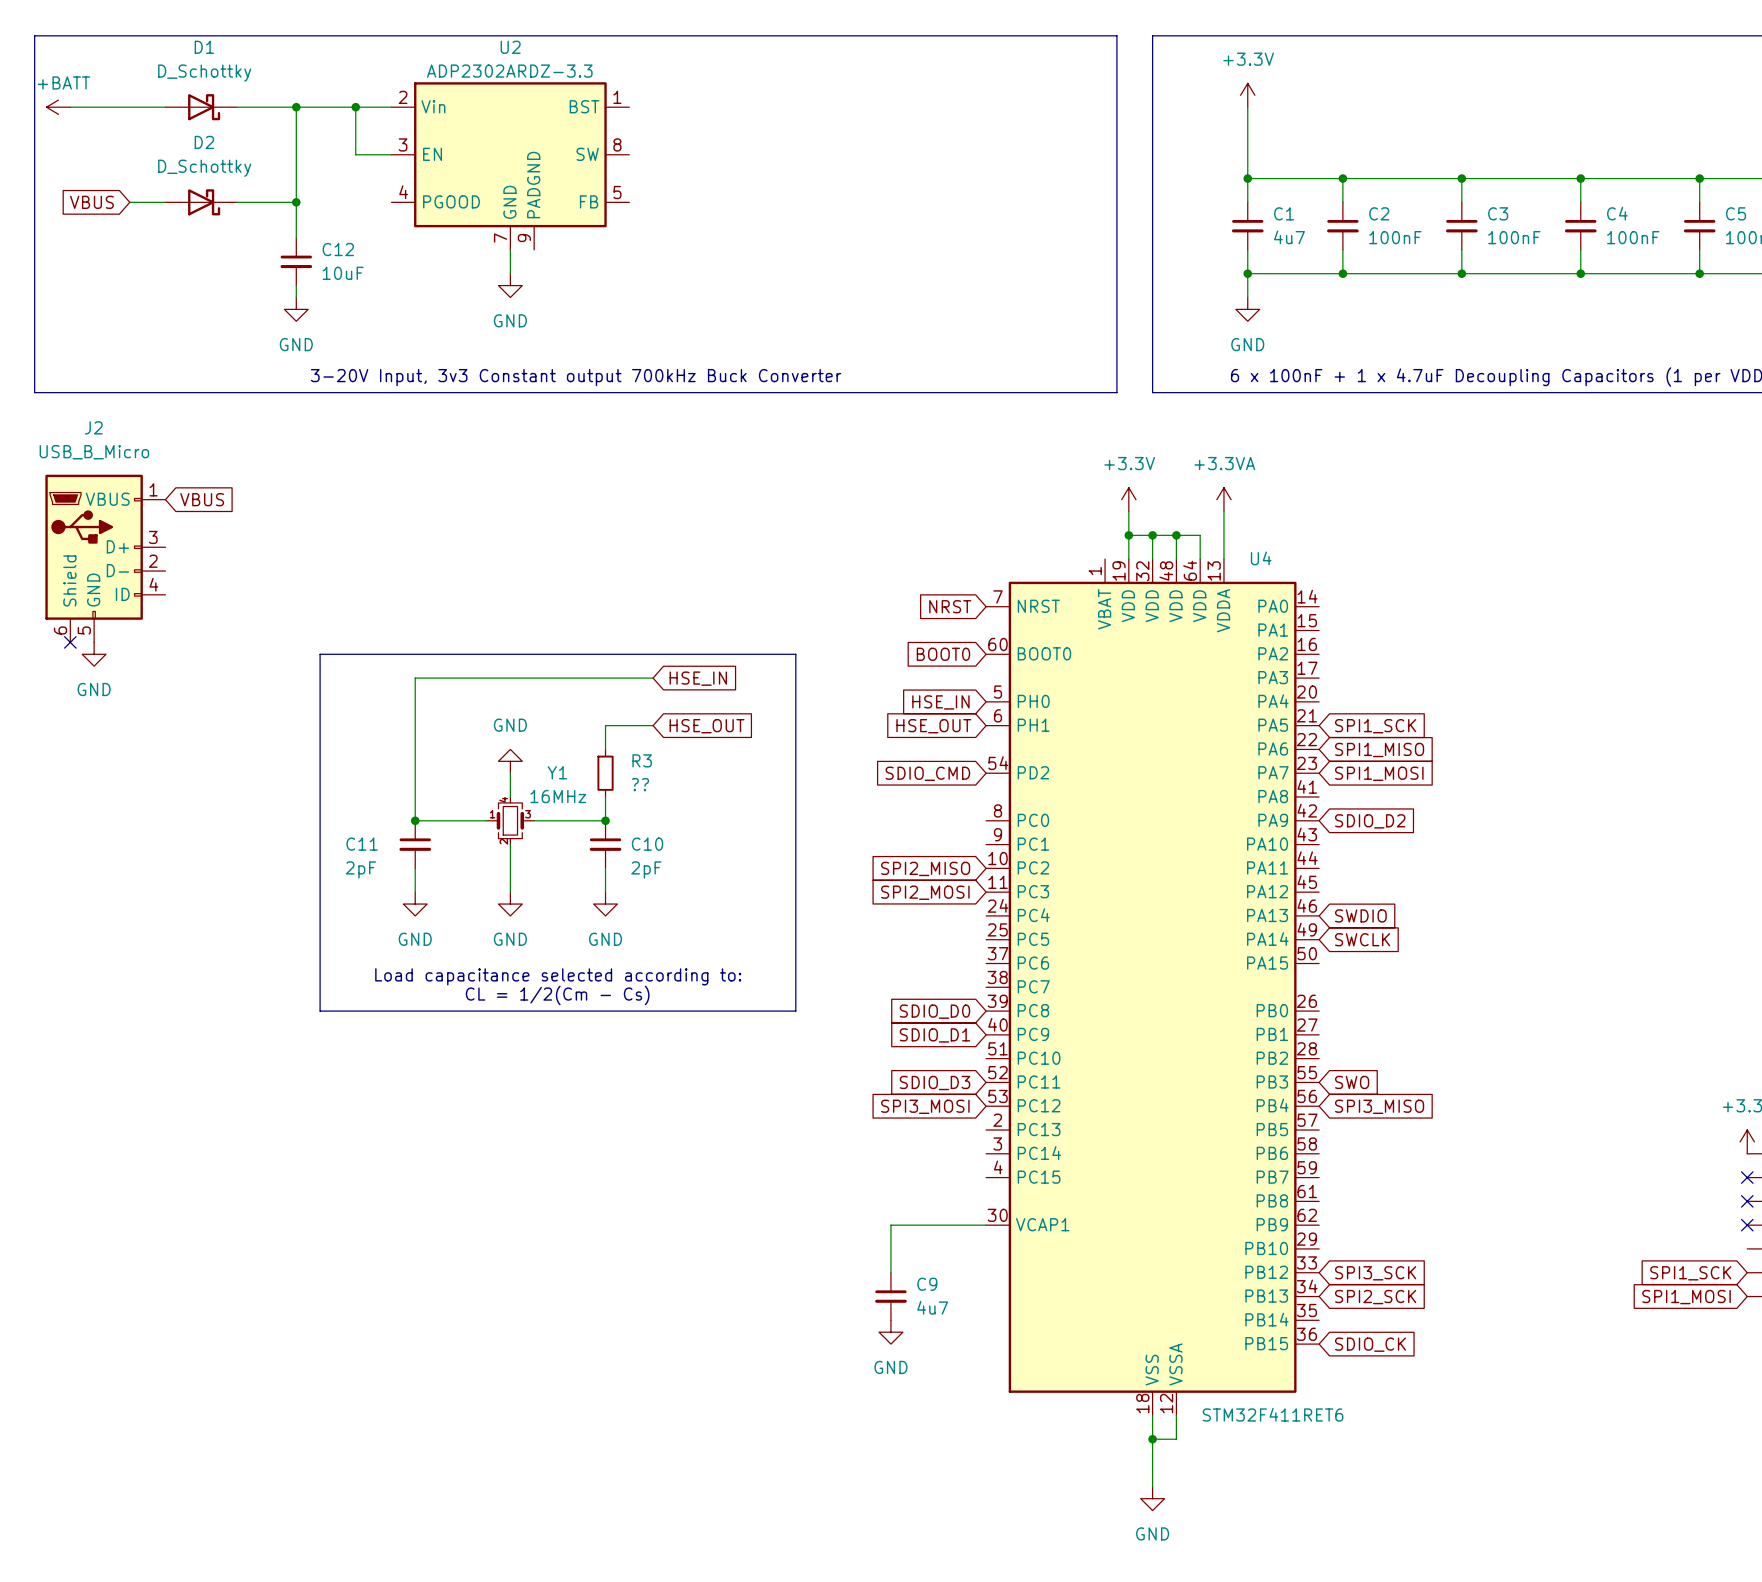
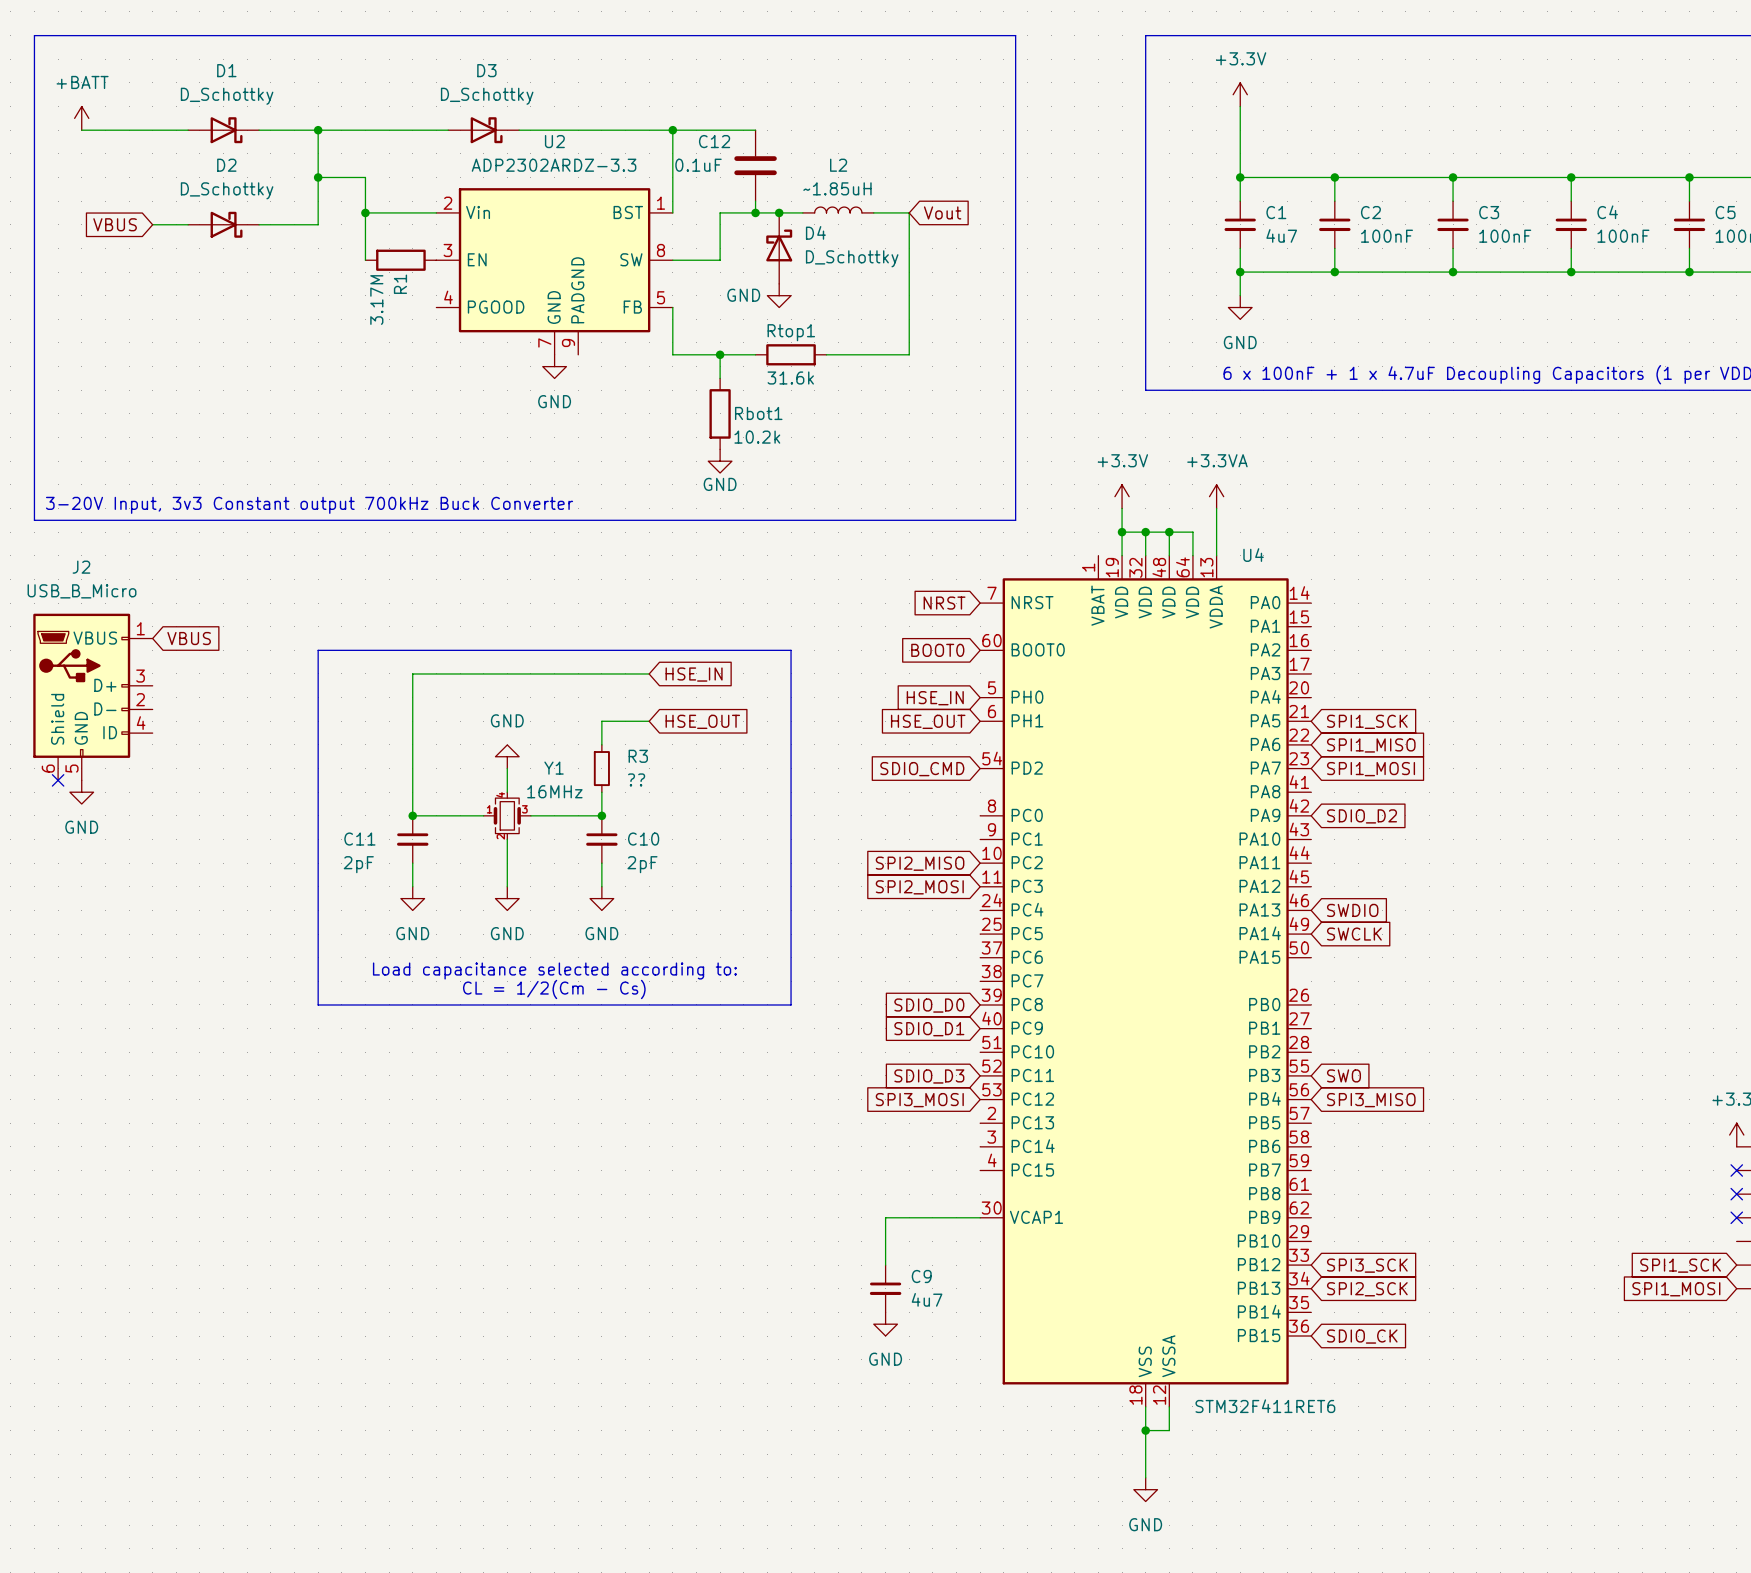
line: (1021, 35) (1116, 35) (1116, 392) (34, 392) -> (1015, 35) (1015, 520) (34, 520) (34, 390)
U2 name position: U2 (510, 47) -> U2 (554, 141)
U2 value position: ADP2302ARDZ-3.3 (509, 71) -> ADP2302ARDZ-3.3 (554, 165)
power symbol rotation: 0° (58, 107) -> 90° clockwise (81, 118)
power symbol position: +BATT (58, 107) -> +BATT (81, 118)
wire: (70, 107) (165, 107) -> none
D1 position: (201, 107) -> (223, 130)
wire: (236, 107) (391, 107) -> none
wire: (296, 107) (296, 238) -> none
junction: (296, 107) -> none
wire: (355, 107) (355, 154) (391, 154) -> none
junction: (355, 107) -> none
wire: none -> (81, 130) (188, 130)
wire: none -> (259, 130) (448, 130)
wire: none -> (318, 130) (318, 224) (259, 224)
junction: none -> (318, 130)
D3: none -> D_Schottky (483, 130)
wire: none -> (519, 130) (755, 130)
wire: none -> (672, 130) (672, 212)
junction: none -> (672, 130)
U2 position: (510, 166) -> (554, 271)
wire: none -> (318, 177) (365, 177) (365, 260)
global label position: VBUS (91, 202) -> VBUS (115, 224)
wire: (129, 202) (165, 202) -> (152, 224) (188, 224)
D2 position: (201, 202) -> (223, 224)
wire: (236, 202) (296, 202) -> none
junction position: (296, 202) -> (318, 177)
wire: none -> (755, 201) (755, 212)
L2: none -> ~1.85uH (838, 210)
wire: none -> (365, 212) (436, 212)
junction: none -> (365, 212)
junction: none -> (755, 212)
junction: none -> (779, 212)
wire: none -> (802, 212) (720, 212) (720, 260) (672, 260)
wire: none -> (873, 212) (909, 212) (909, 354) (826, 354)
global label: none -> Vout (942, 212)
C12 symbol: [280, 238, 313, 286] -> [734, 130, 777, 202]
C12 name position: C12 (338, 249) -> C12 (714, 141)
D4: none -> D_Schottky (779, 248)
R1: none -> 3.17M (400, 260)
C12 value: 10uF (343, 273) -> 0.1uF (698, 165)
wire: (296, 285) (296, 297) -> none
power symbol position: GND (510, 285) -> GND (554, 366)
power symbol: none -> GND (779, 295)
power symbol: GND (296, 309) -> none
wire: none -> (672, 307) (672, 354) (755, 354)
wire: none -> (720, 354) (720, 378)
junction: none -> (720, 354)
Rtop1: none -> 31.6k (791, 354)
text: 3-20V Input, 3v3 Constant output 700kHz Buck Converter (576, 377) -> none
Rbot1: none -> 10.2k (720, 413)
power symbol: none -> GND (720, 461)
global label: VBUS (202, 499) -> none
text: none -> 3-20V Input, 3v3 Constant output 700kHz Buck Converter (309, 505)
J2 position: (105, 558) -> (92, 697)
no-connect mark: (70, 642) -> none
global label: none -> VBUS (189, 638)
power symbol position: GND (94, 654) -> GND (81, 792)
no-connect mark: none -> (58, 780)

